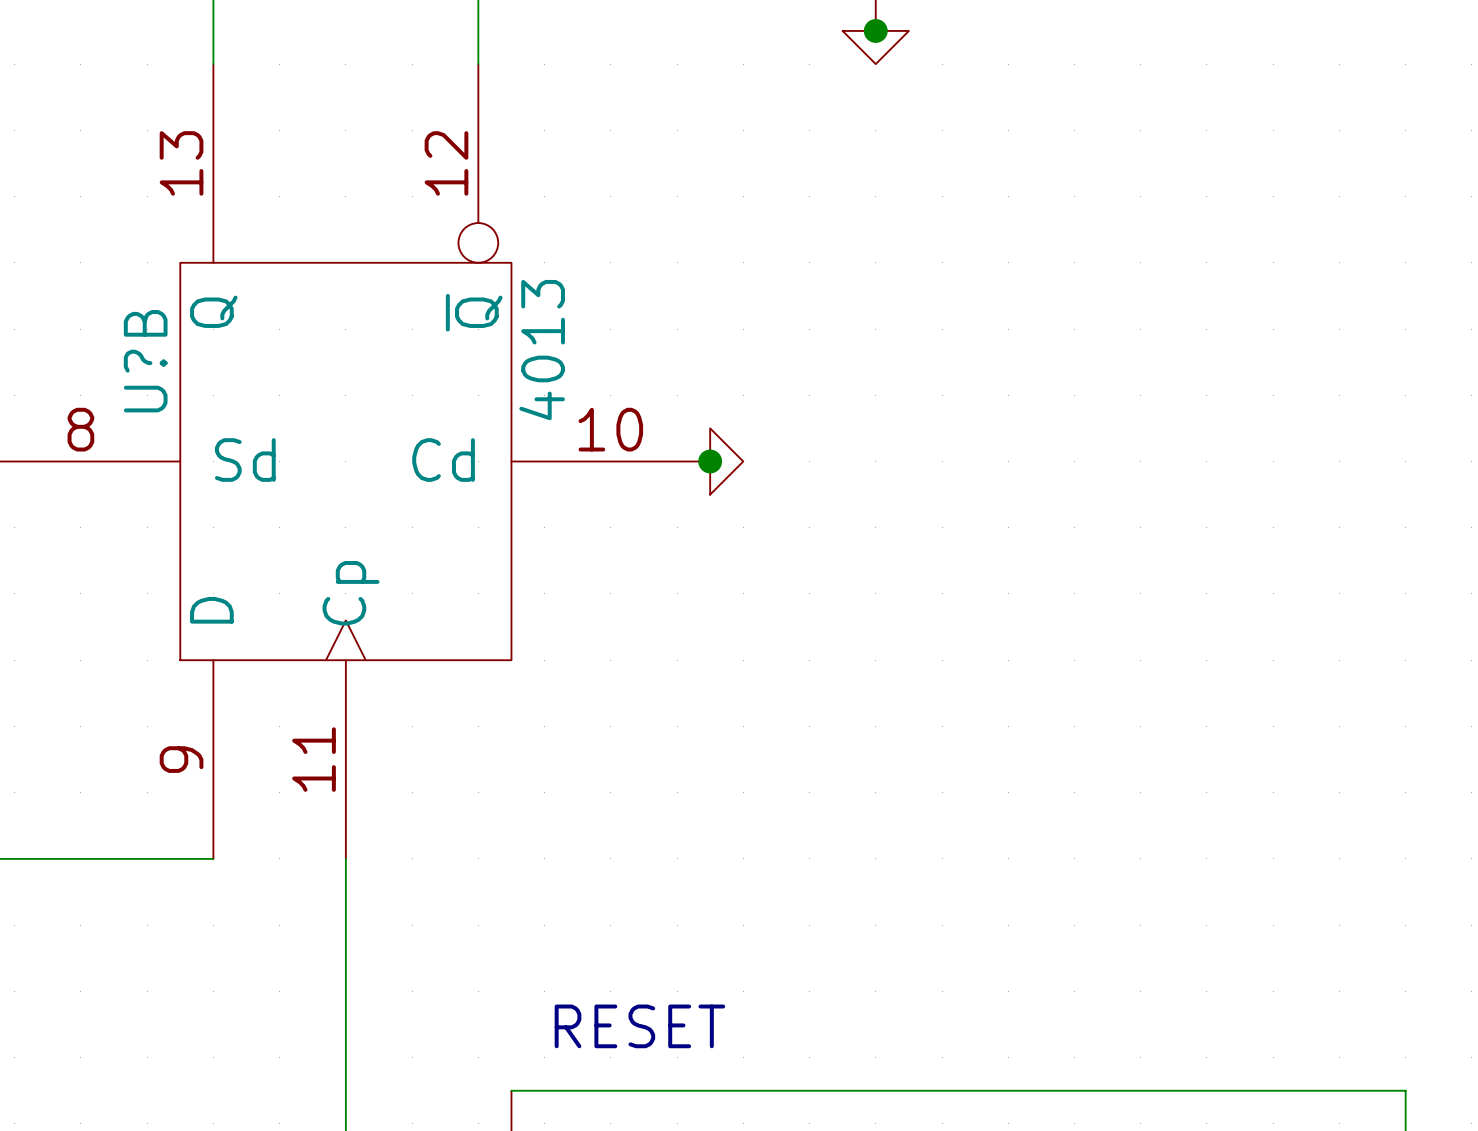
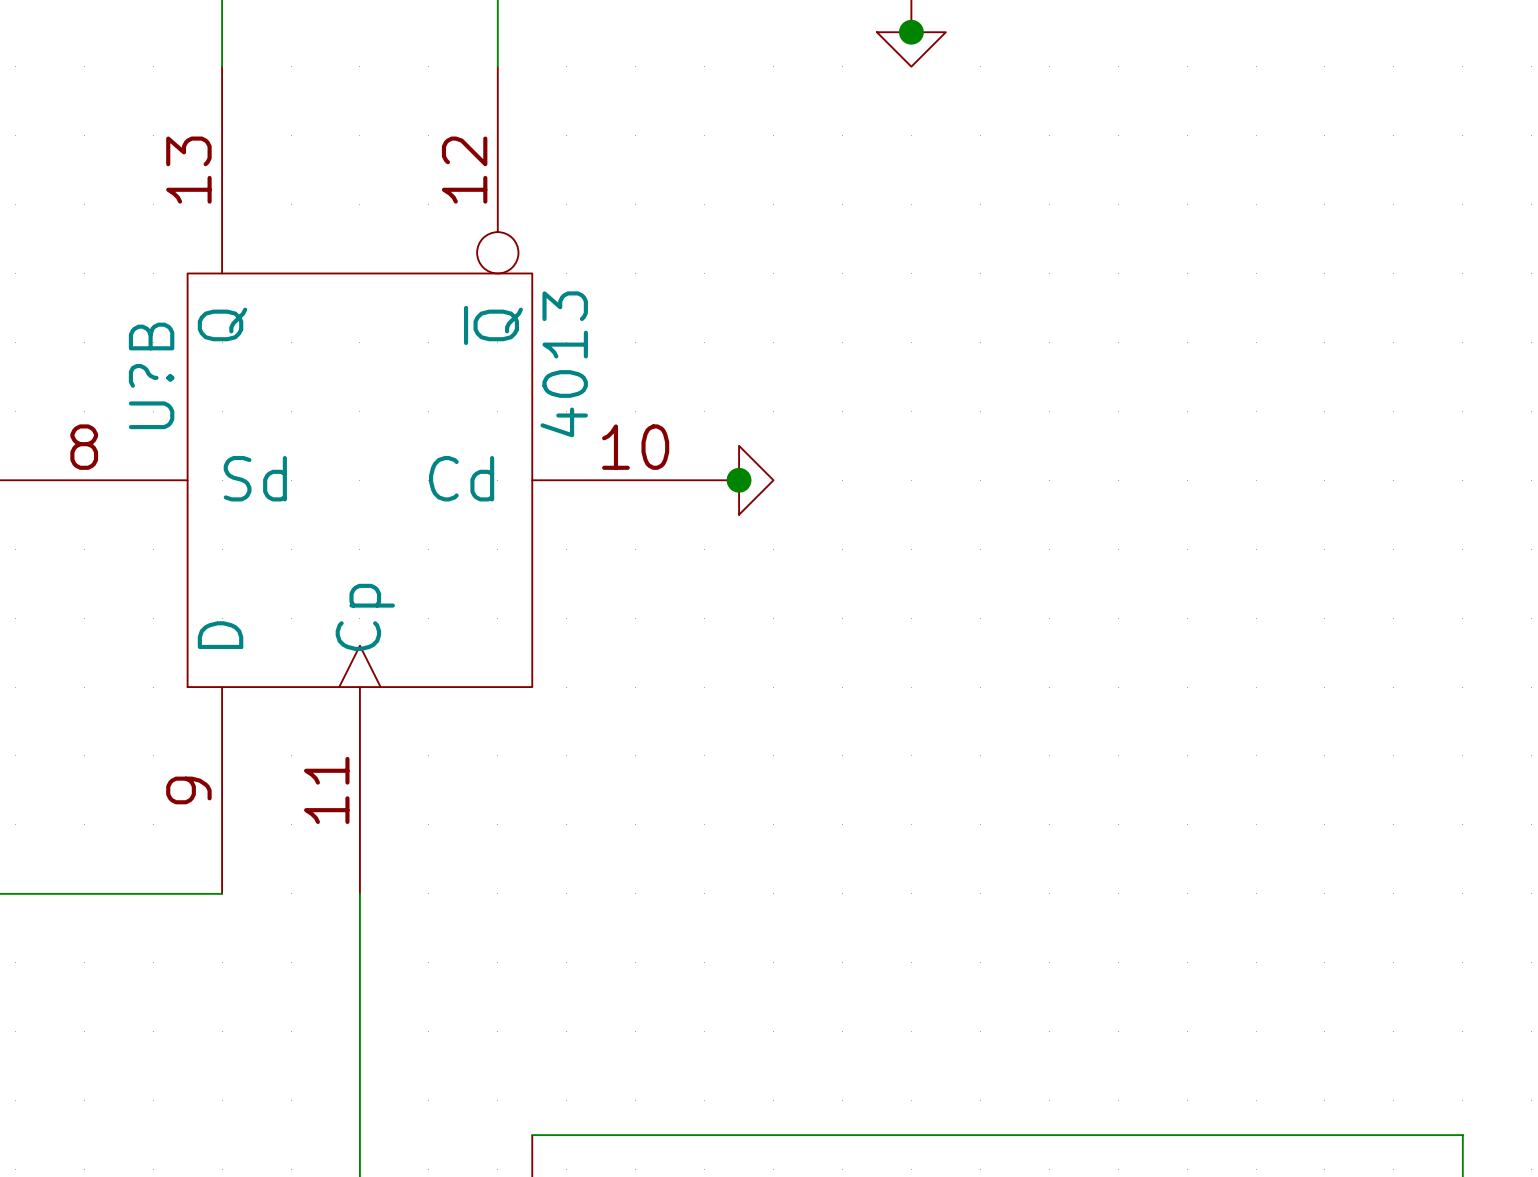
text: RESET (639, 1026) -> none

